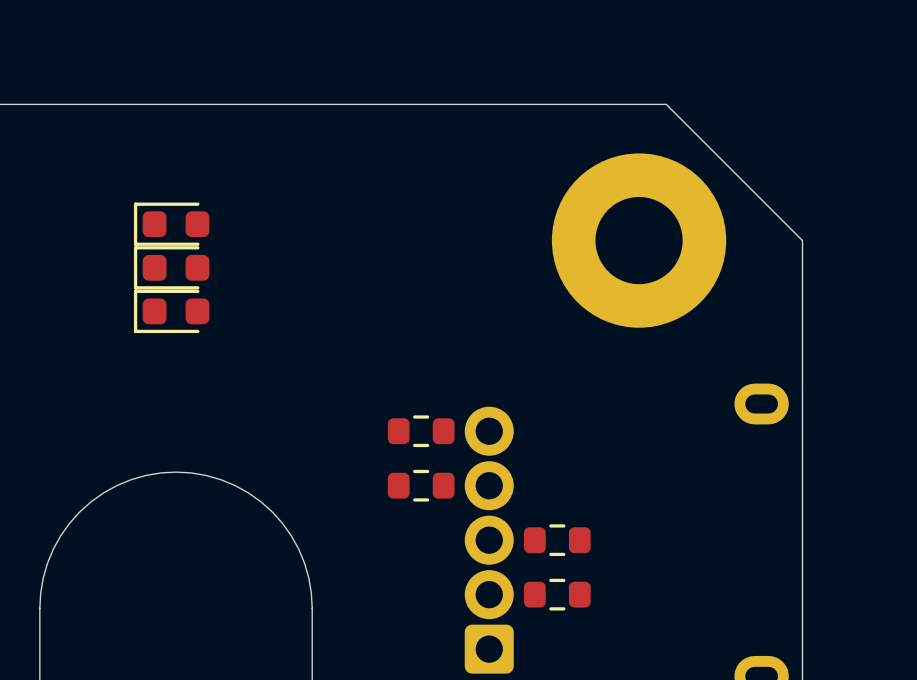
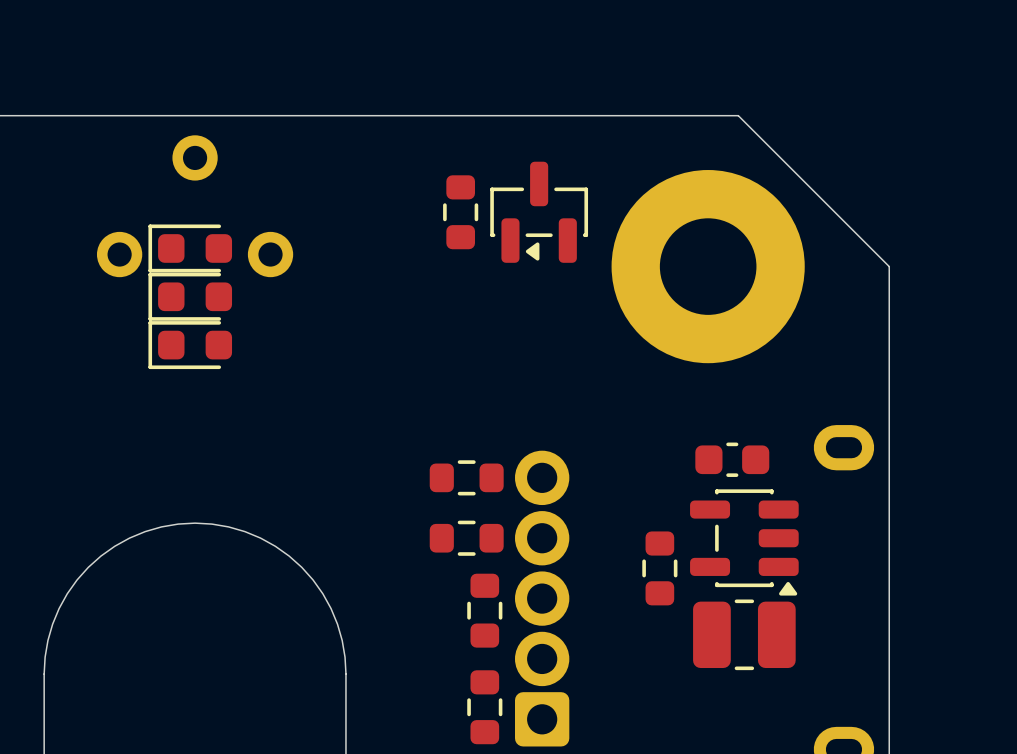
part: none -> (195, 206)
part: none -> (460, 212)
part: none -> (539, 212)
part: none -> (732, 459)
part: none -> (744, 542)
part: none -> (659, 568)
part: (557, 540) -> none
part: none -> (484, 610)
part: none -> (744, 634)
part: (557, 594) -> none
part: none -> (484, 707)

